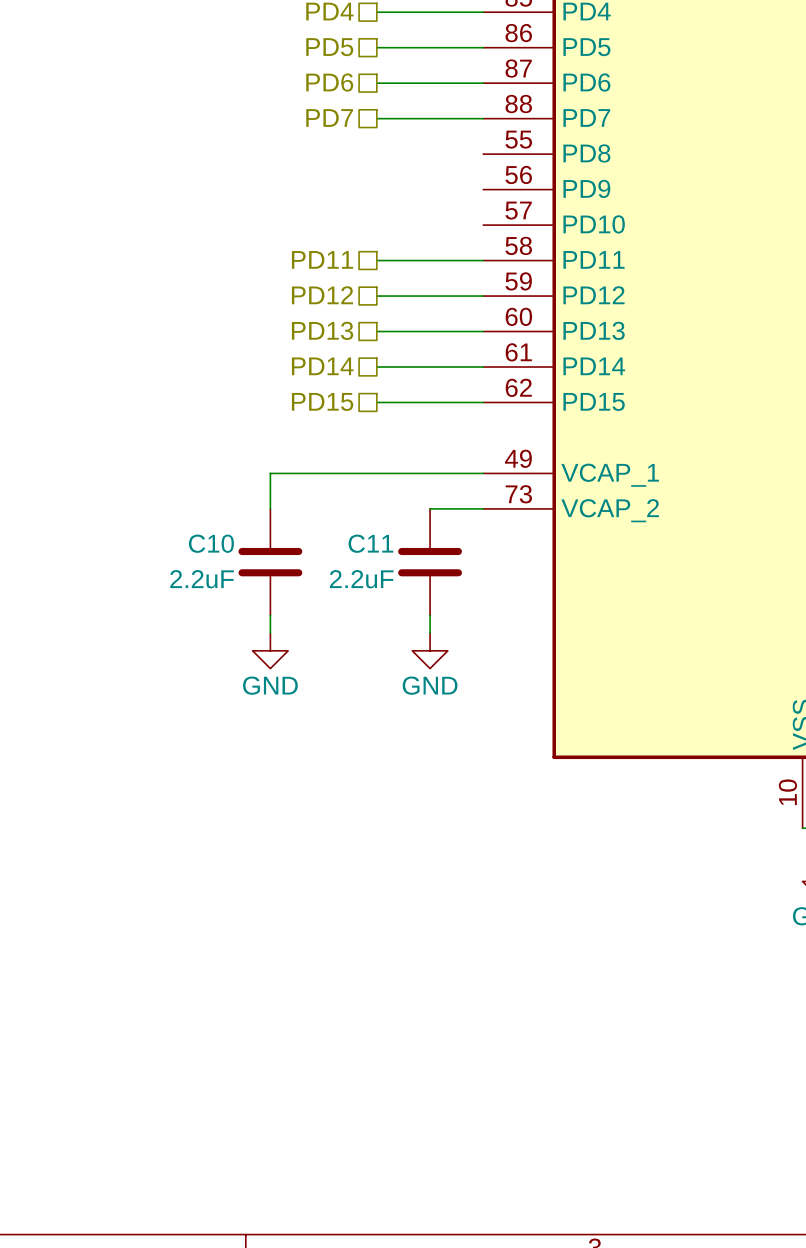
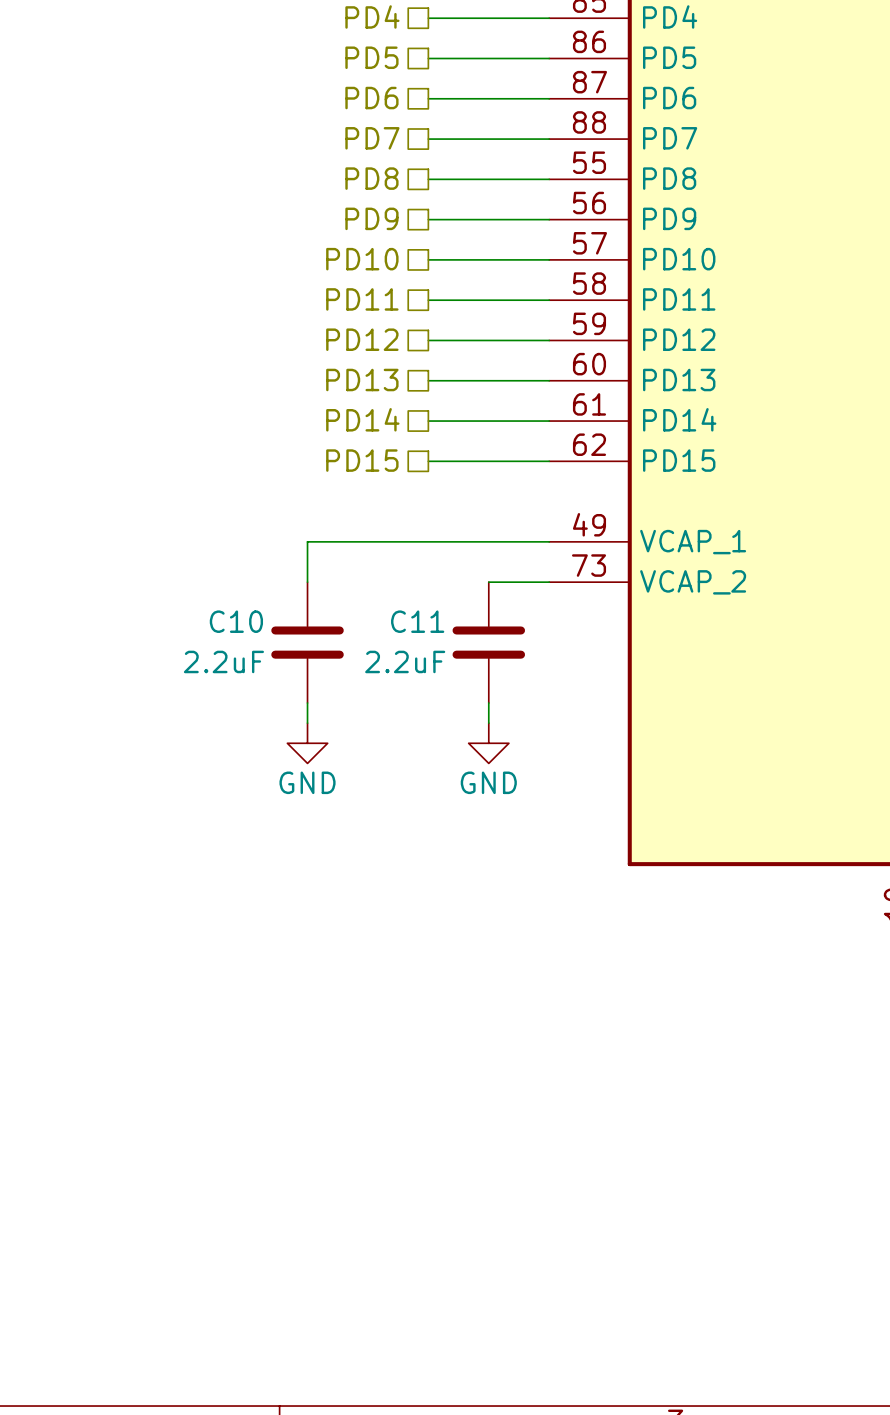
hierarchical label: none -> PD8 (371, 178)
wire: none -> (428, 179) (549, 179)
hierarchical label: none -> PD9 (371, 218)
wire: none -> (428, 219) (549, 219)
hierarchical label: none -> PD10 (362, 259)
wire: none -> (428, 259) (549, 259)

